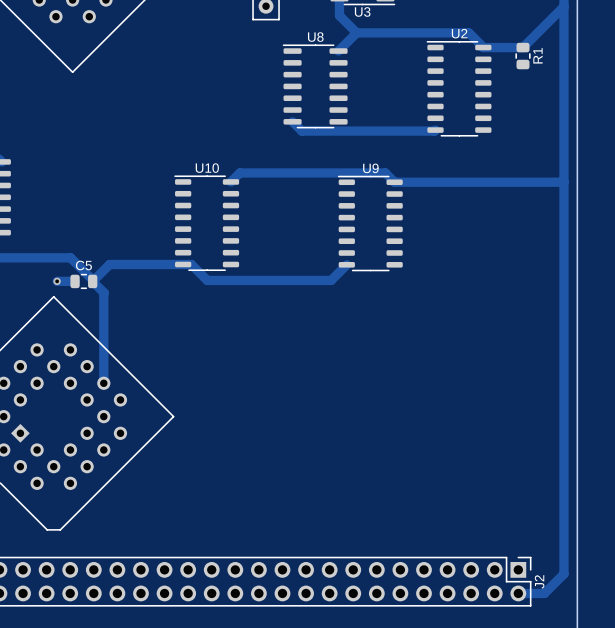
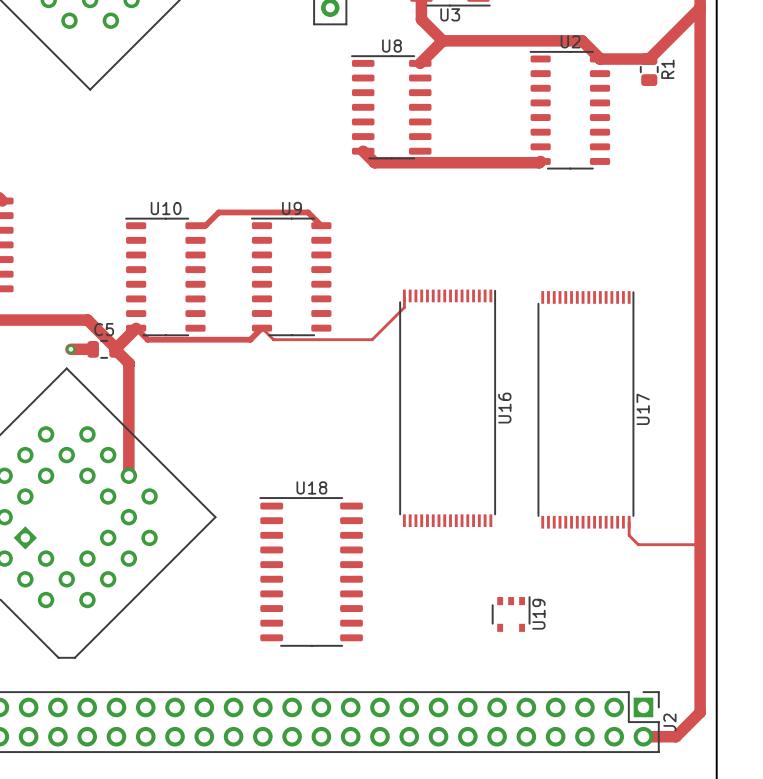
track: none -> (195, 225) (205, 225) (218, 212) (308, 212) (321, 225)
track: (230, 181) (239, 172) (385, 172) (394, 182) (563, 182) -> none
U10 position: (206, 223) -> (165, 276)
U9 position: (370, 223) -> (291, 276)
track: (109, 264) (191, 264) (207, 280) (331, 280) (346, 264) -> (136, 328) (147, 339) (250, 339) (262, 328) (273, 339) (372, 339) (404, 307) (404, 295)
U16: none -> (447, 408)
U17: none -> (585, 409)
track: none -> (629, 522) (629, 535) (638, 544) (700, 544)
U18: none -> (311, 571)
U19: none -> (511, 614)

